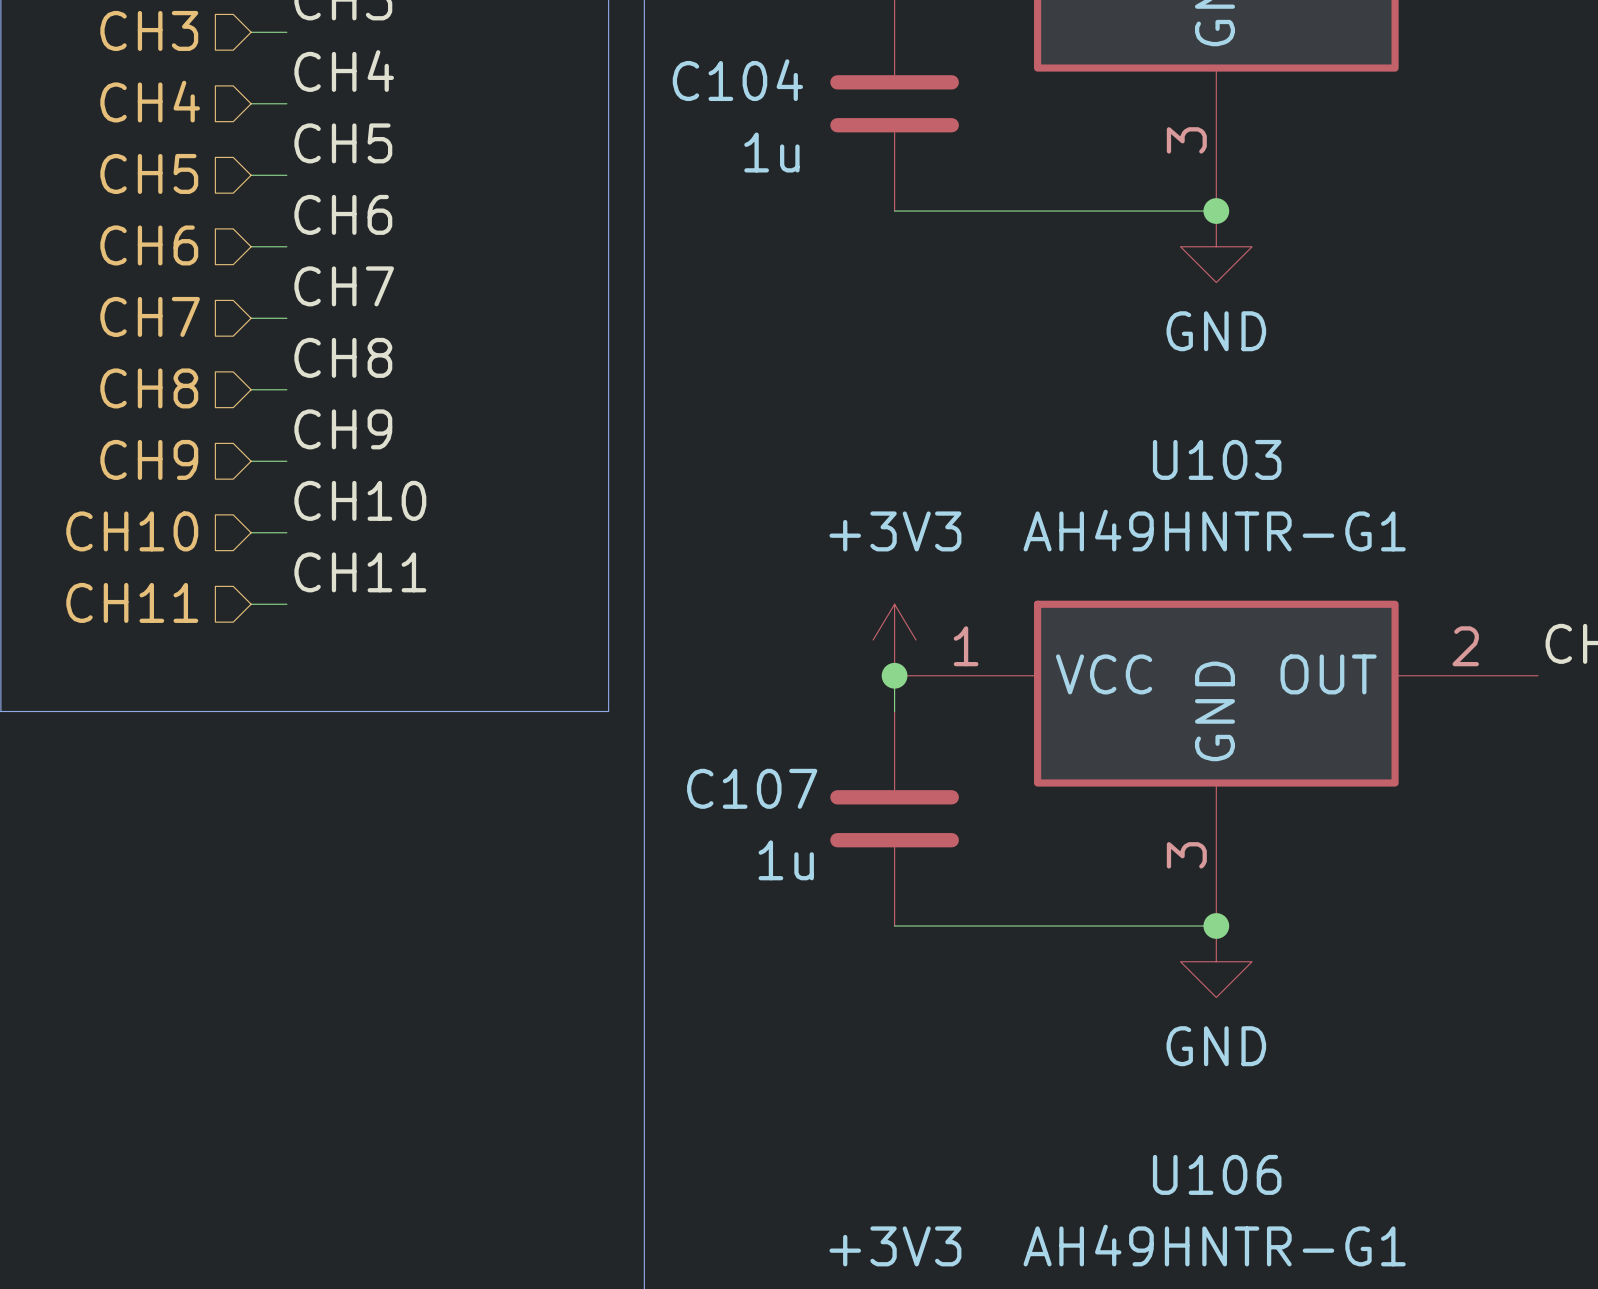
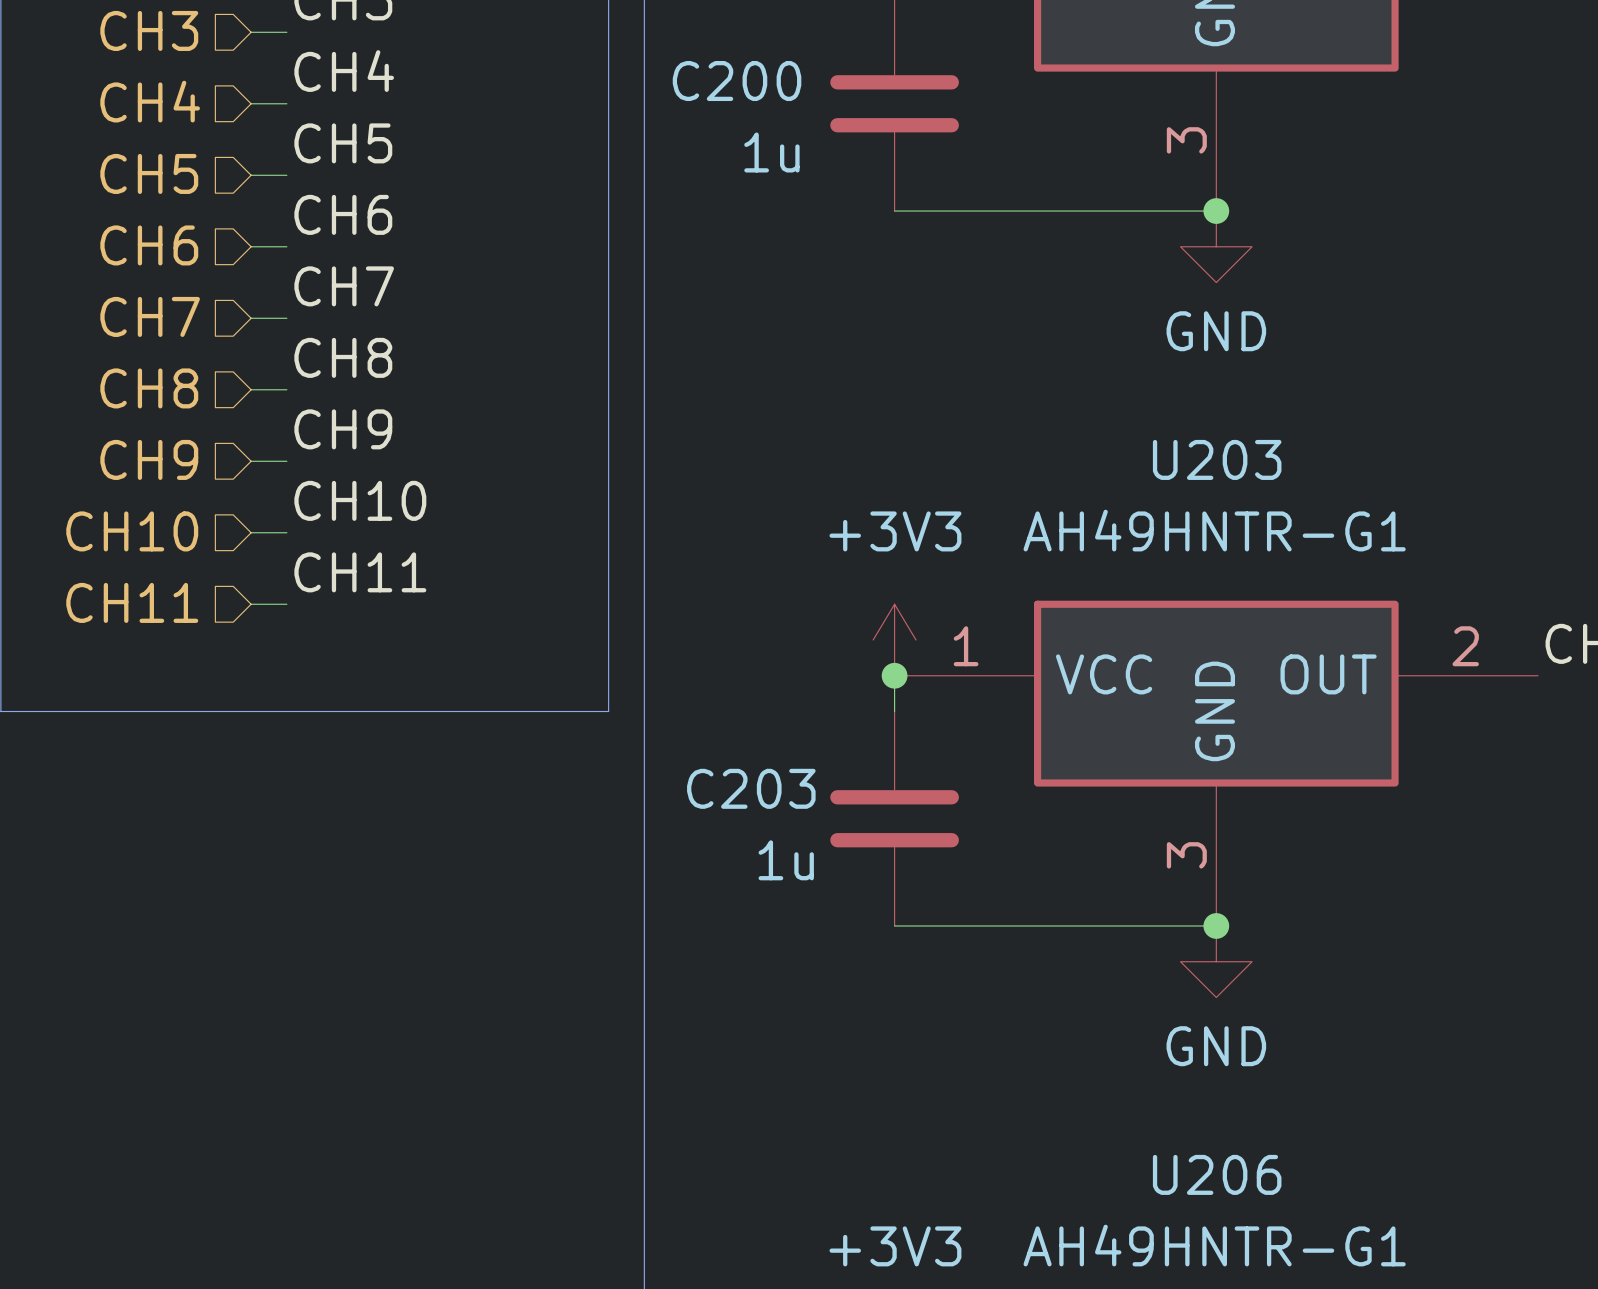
C104 name: C104 (737, 80) -> C200 (737, 81)
U103 name: U103 (1217, 459) -> U203 (1217, 459)
C107 name: C107 (752, 788) -> C203 (751, 788)
U106 name: U106 (1217, 1174) -> U206 (1217, 1174)

